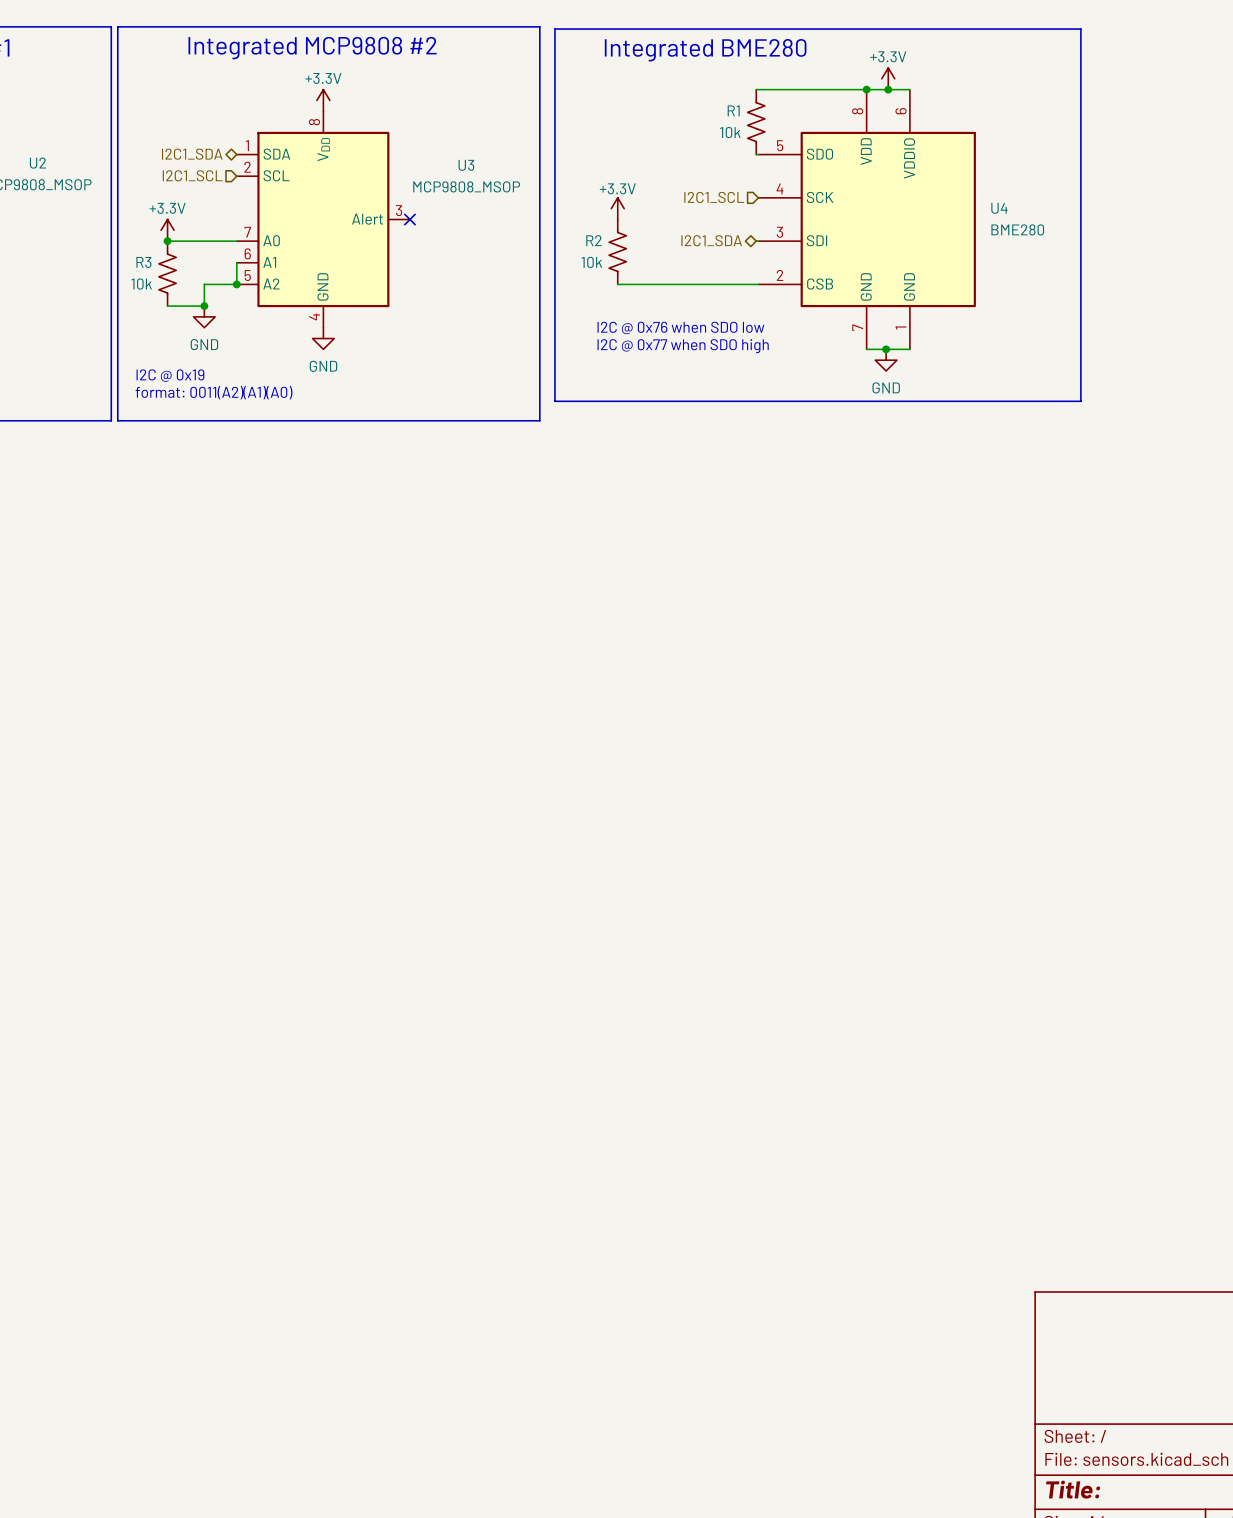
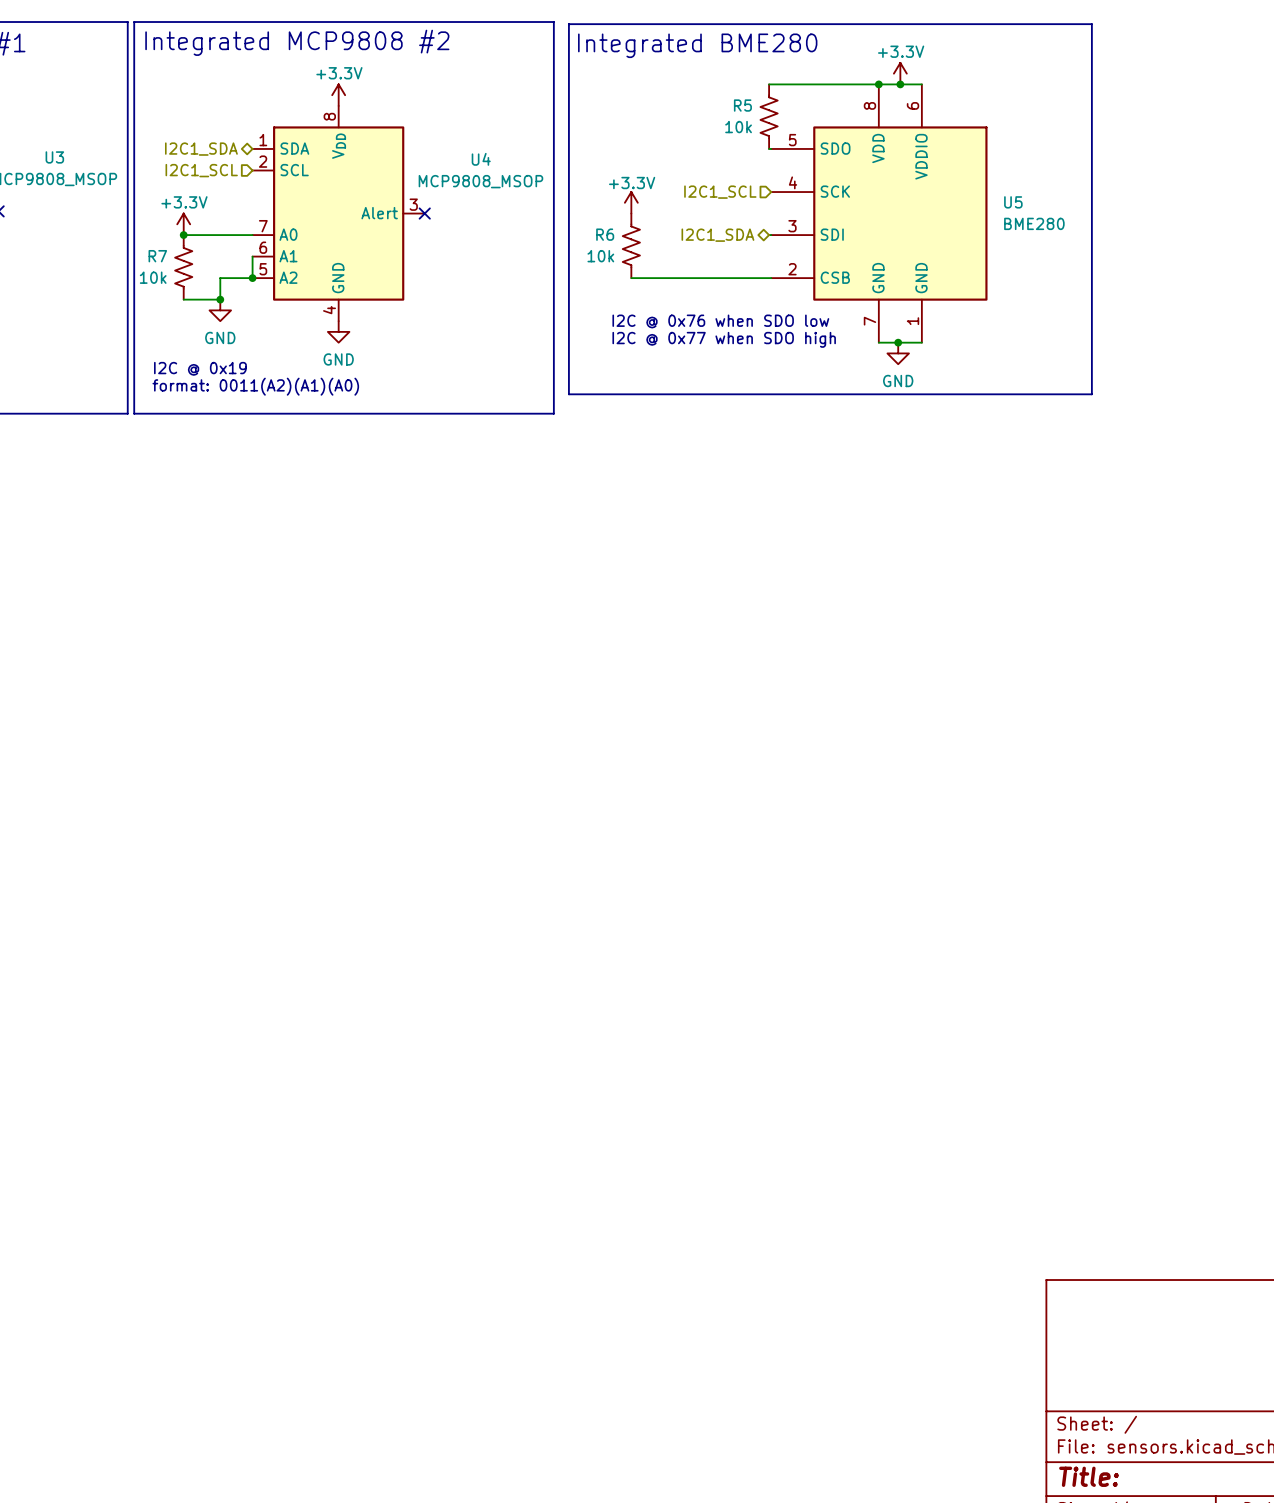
R1 name: R1 (733, 110) -> R5 (742, 105)
U2 name: U2 (37, 163) -> U3 (54, 157)
U3 name: U3 (466, 165) -> U4 (481, 159)
U4 name: U4 (999, 208) -> U5 (1013, 202)
R2 name: R2 (593, 240) -> R6 (605, 234)
R3 name: R3 (143, 262) -> R7 (157, 256)

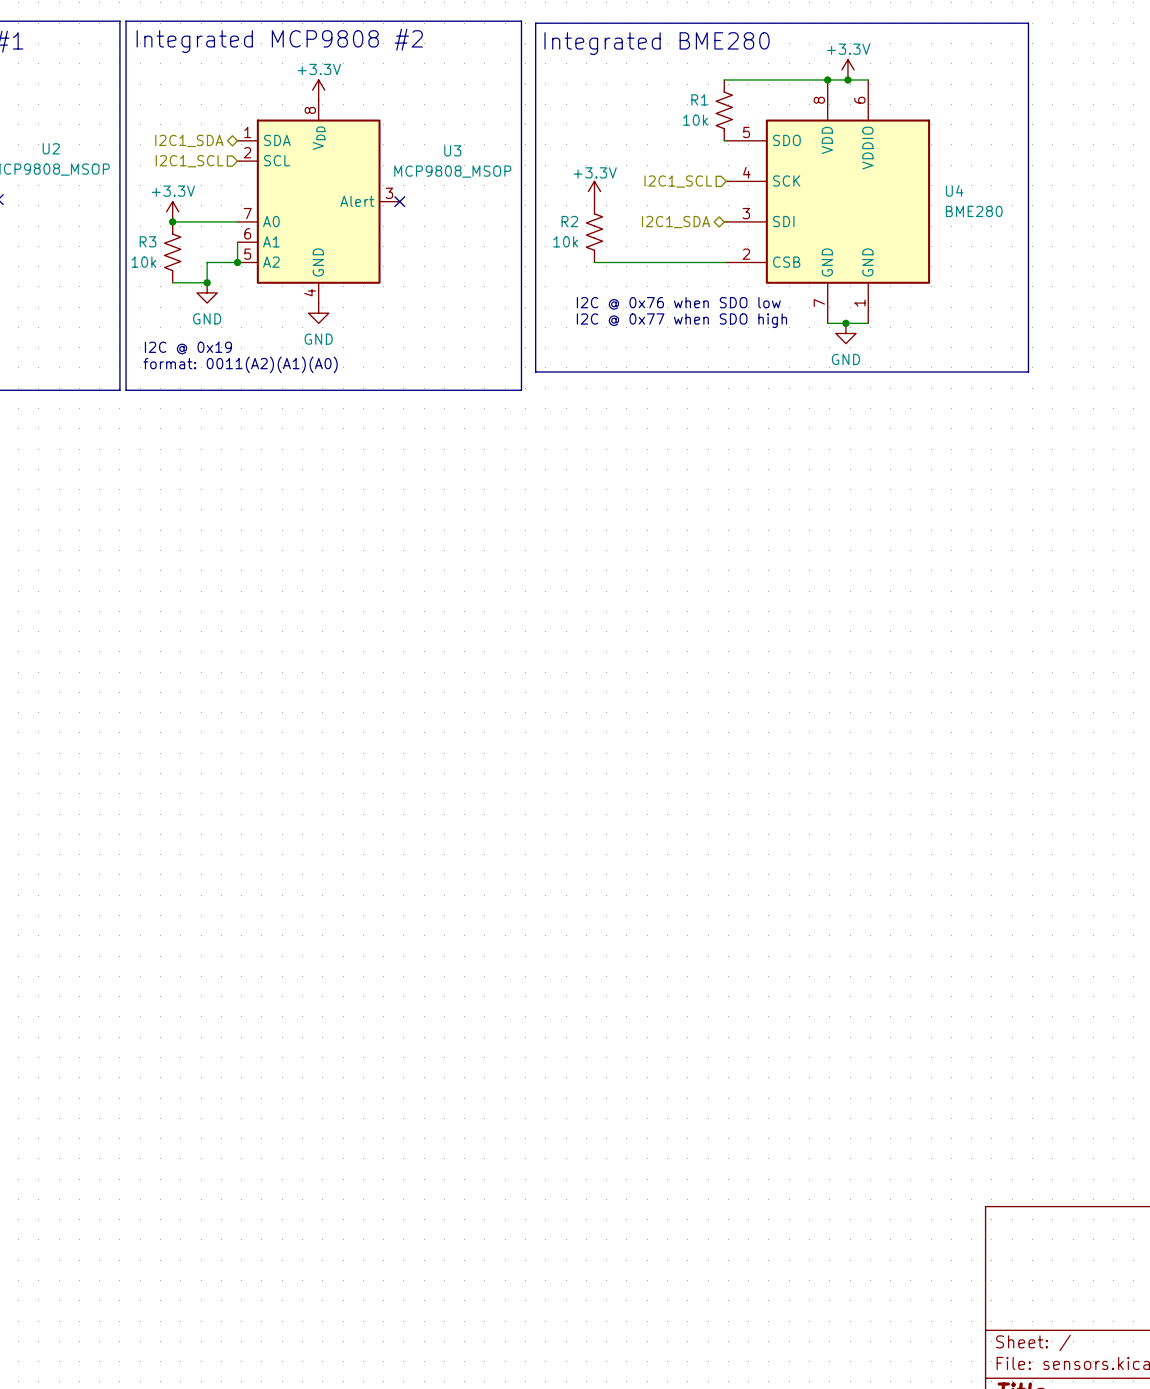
R5 name: R5 (742, 105) -> R1 (699, 99)
U3 name: U3 (54, 157) -> U2 (51, 148)
U4 name: U4 (481, 159) -> U3 (452, 150)
U5 name: U5 (1013, 202) -> U4 (954, 190)
R6 name: R6 (605, 234) -> R2 (569, 221)
R7 name: R7 (157, 256) -> R3 (148, 241)

